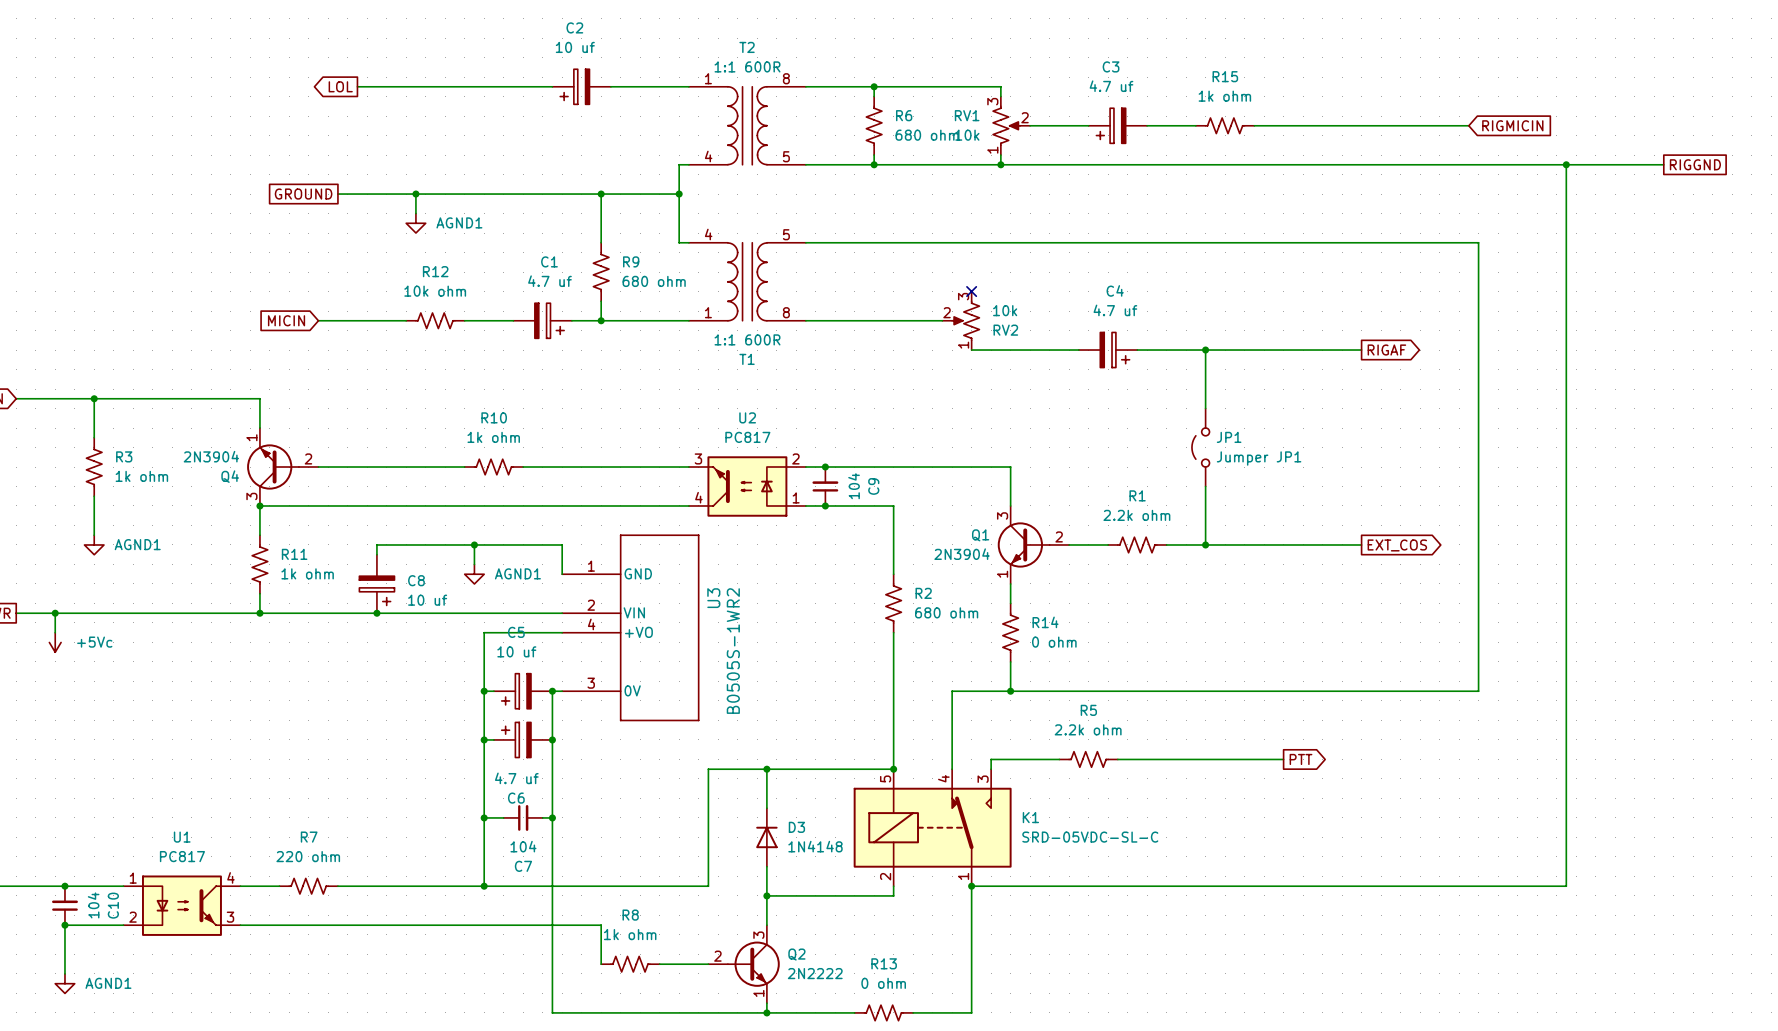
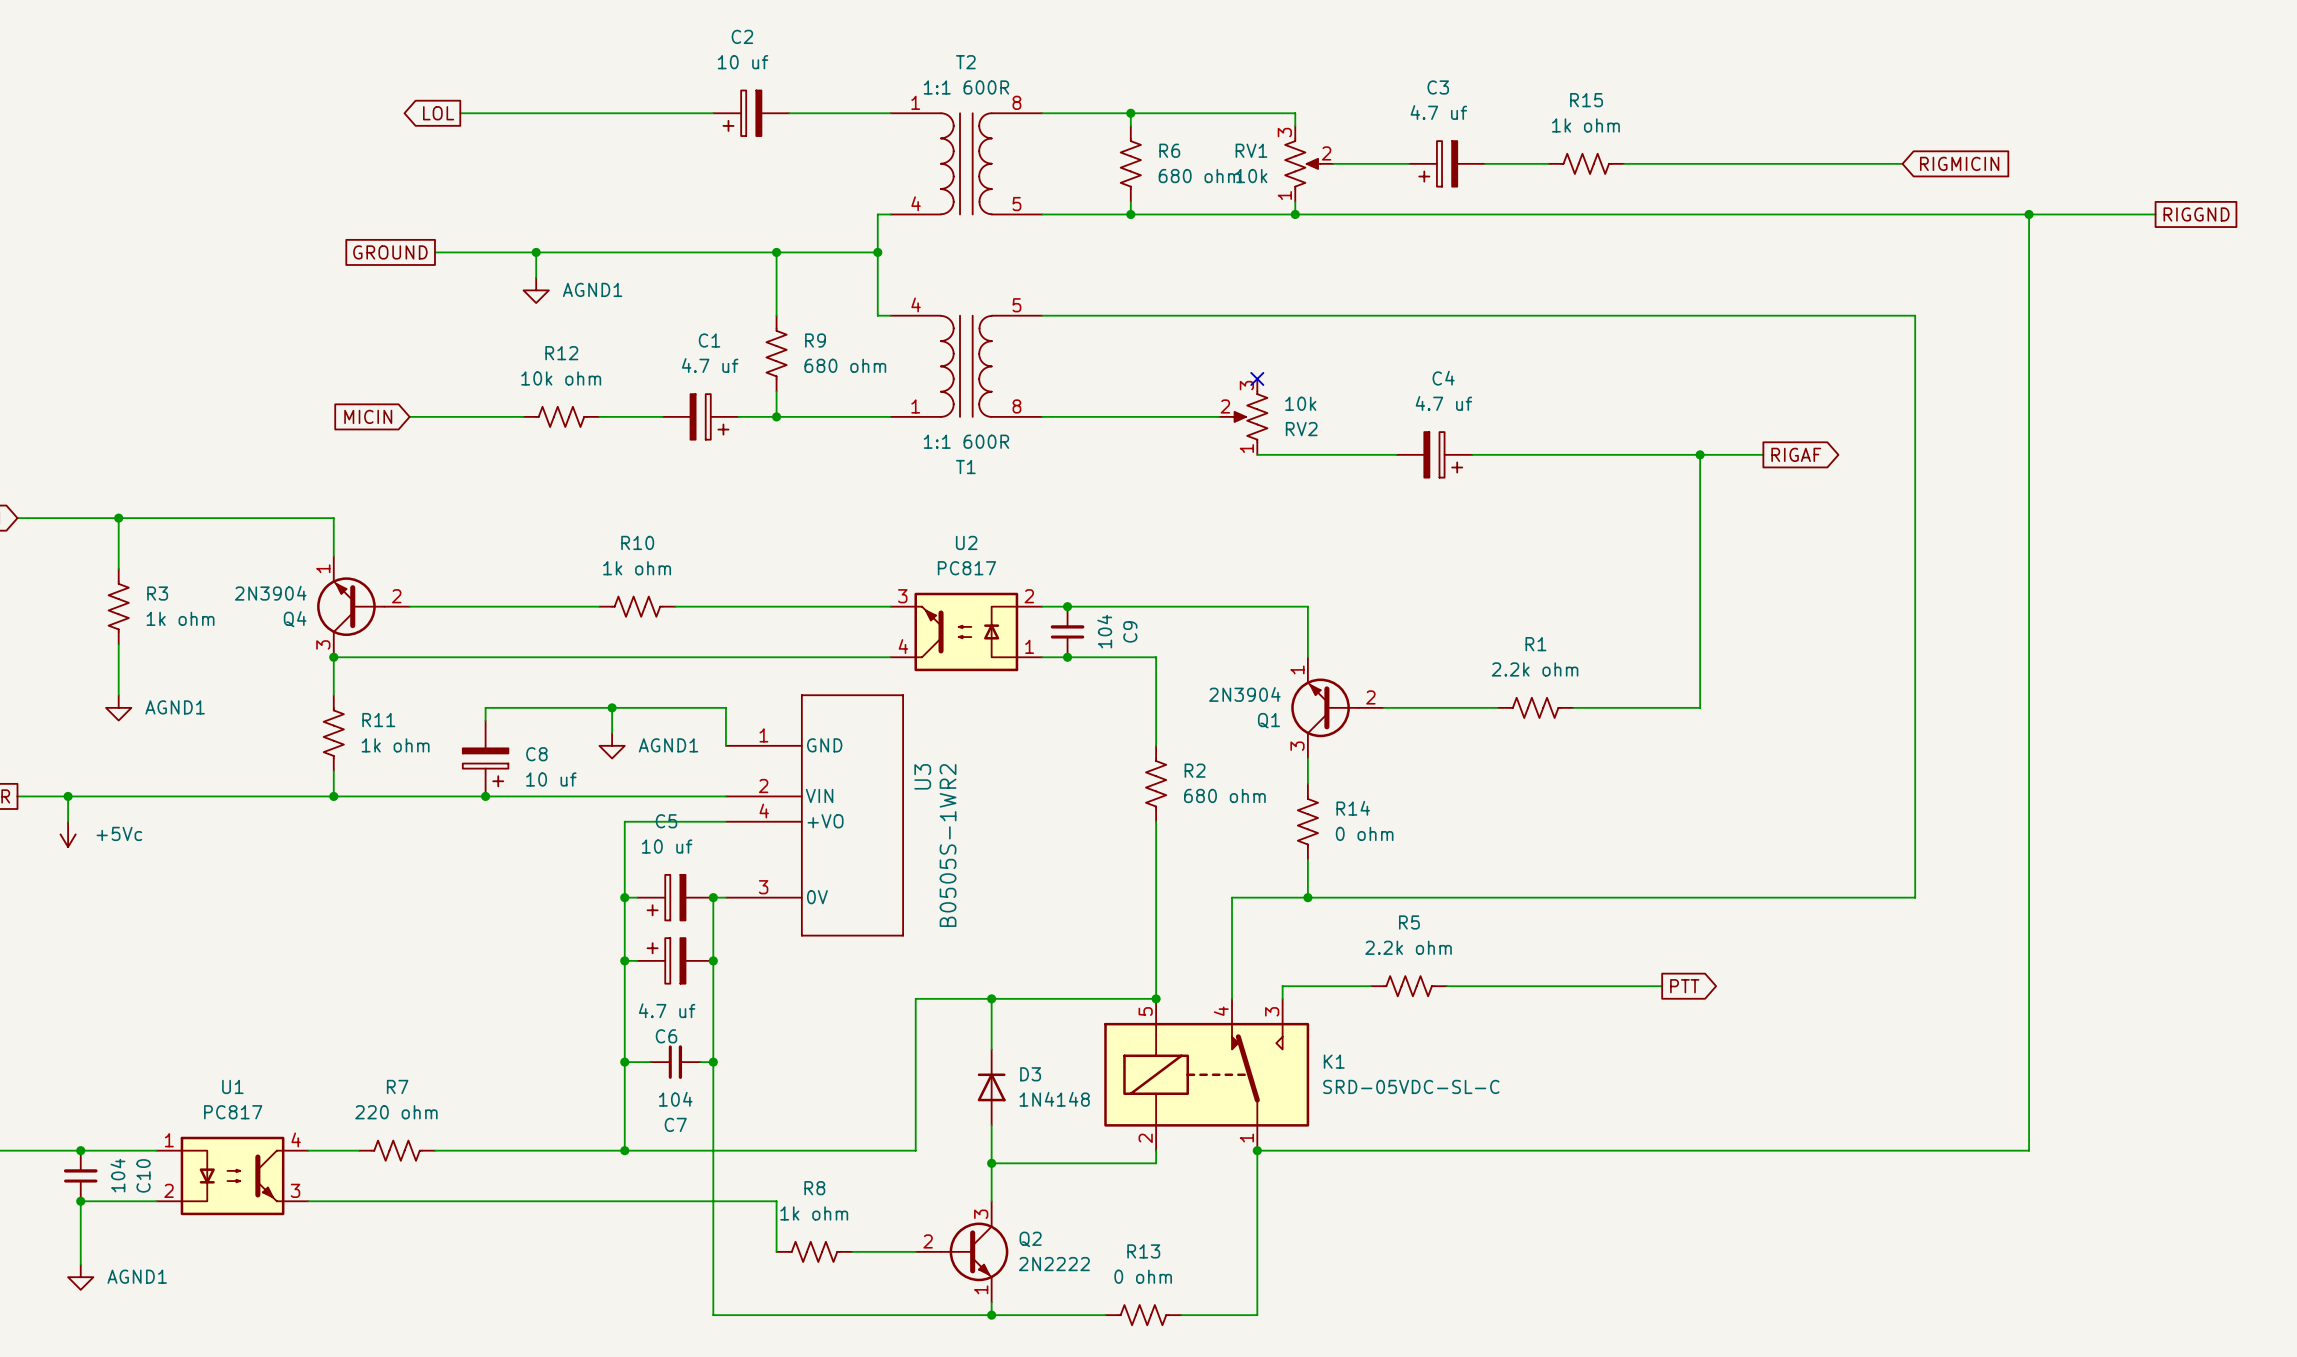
wire: (1205, 350) (1205, 408) -> none
junction: (1205, 350) -> none
junction: none -> (1700, 454)
JP1: Jumper JP1 (1200, 447) -> none
wire: (1205, 486) (1205, 544) -> none
Q1 flip: as is (1023, 544) -> up-down (1324, 707)
R1 position: (1137, 544) -> (1535, 707)
wire: (1166, 544) (1215, 544) -> (1434, 707) (1497, 707)
junction: (1205, 544) -> none
wire: (1312, 544) (1361, 544) -> (1700, 707) (1700, 454)
global label: EXT_COS (1397, 545) -> none

